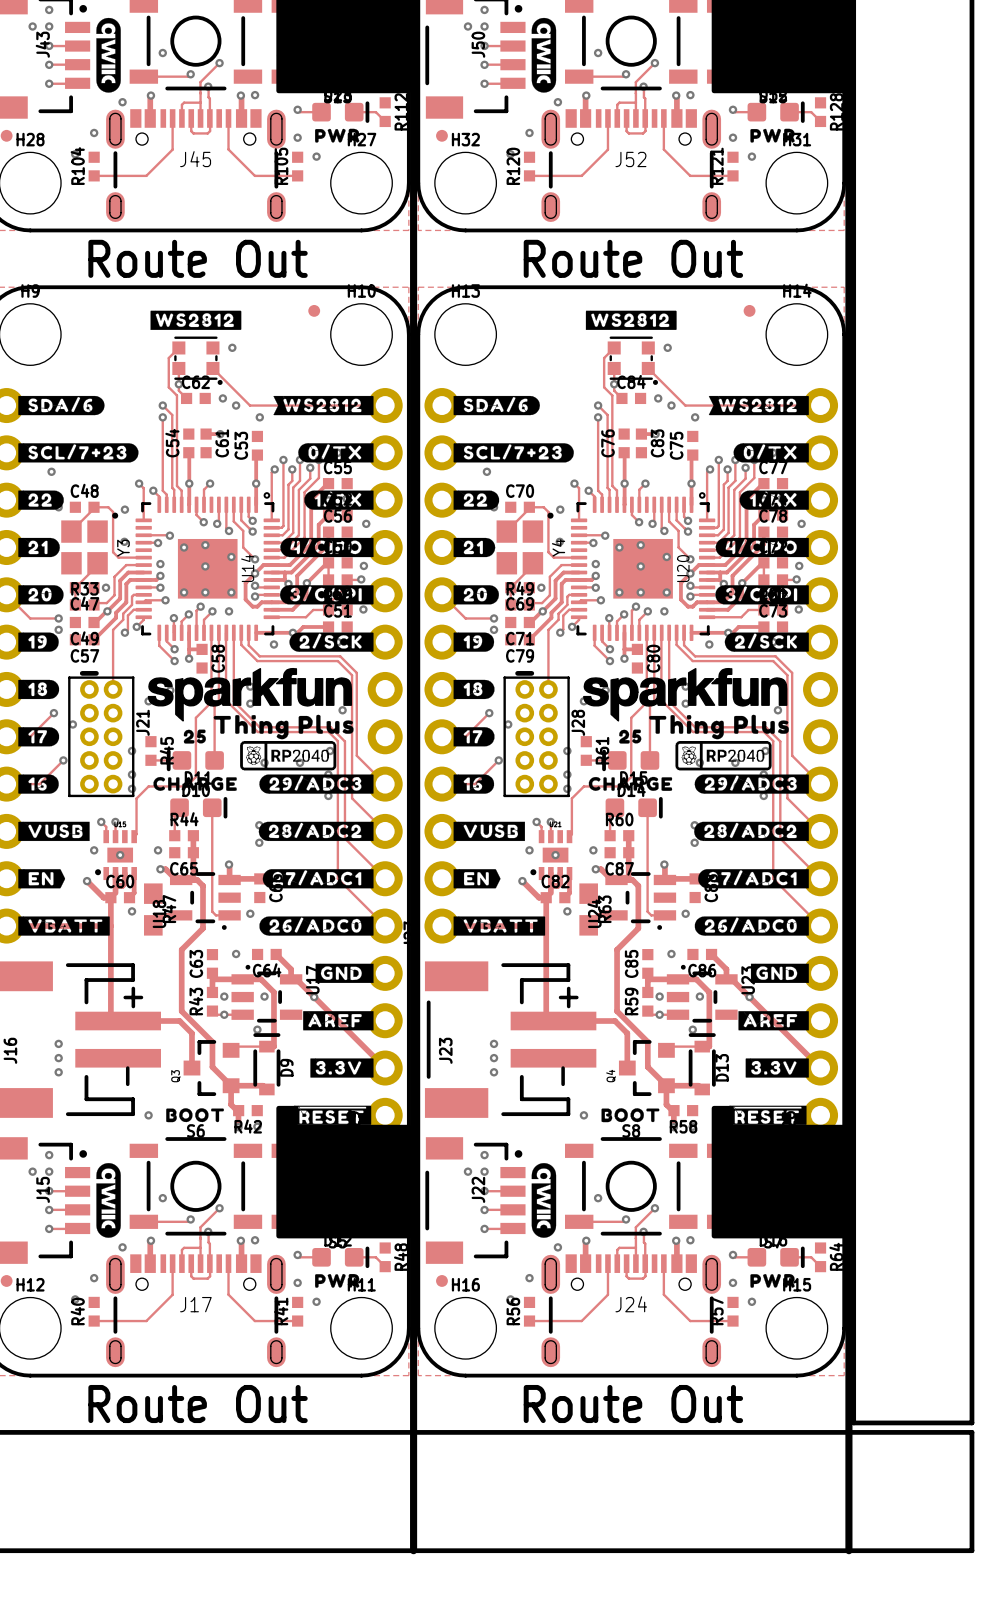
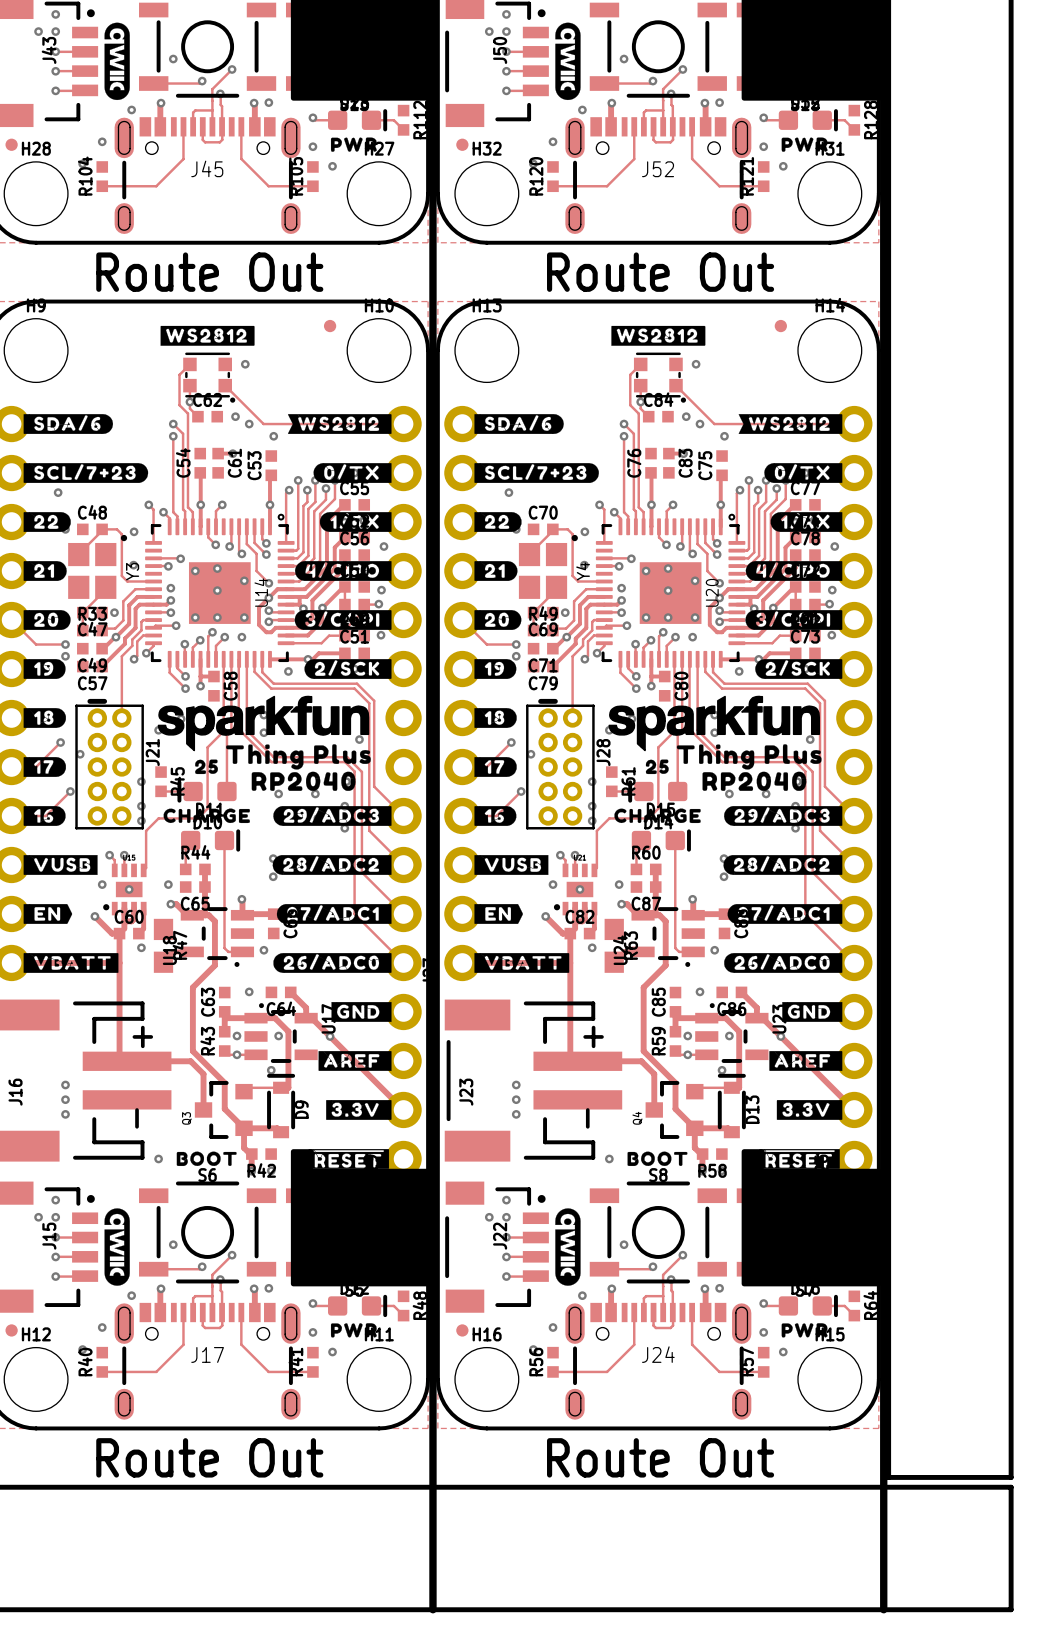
drawing shape: [240, 740, 337, 771] -> [251, 771, 356, 791]
drawing shape: [675, 740, 772, 771] -> [702, 771, 807, 791]

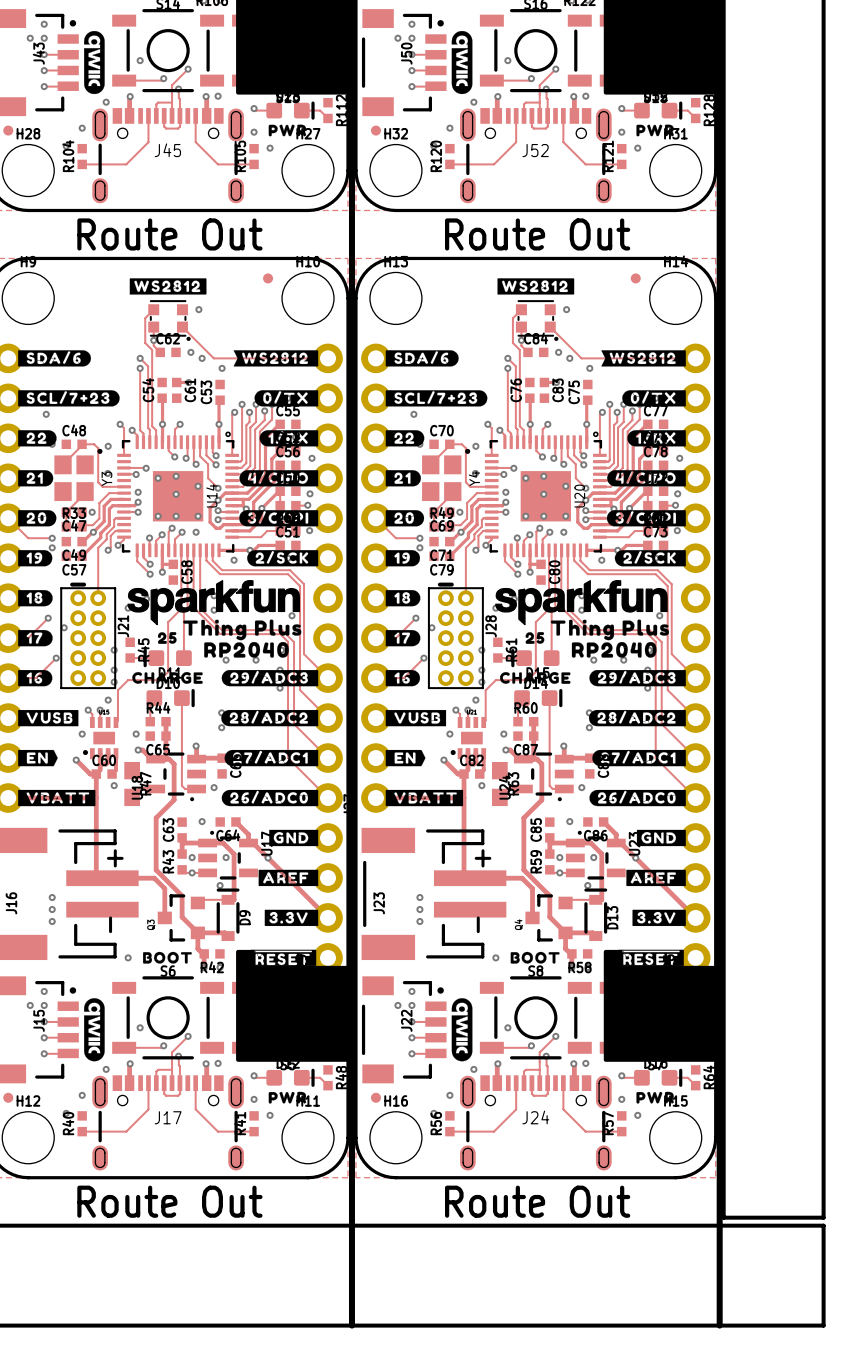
track: (176, 625) (155, 625) (153, 627) -> none
via: (176, 625) -> none
track: (626, 625) (606, 625) (604, 627) -> none
via: (626, 625) -> none
via position: (129, 889) -> (108, 700)
via position: (579, 889) -> (475, 700)

